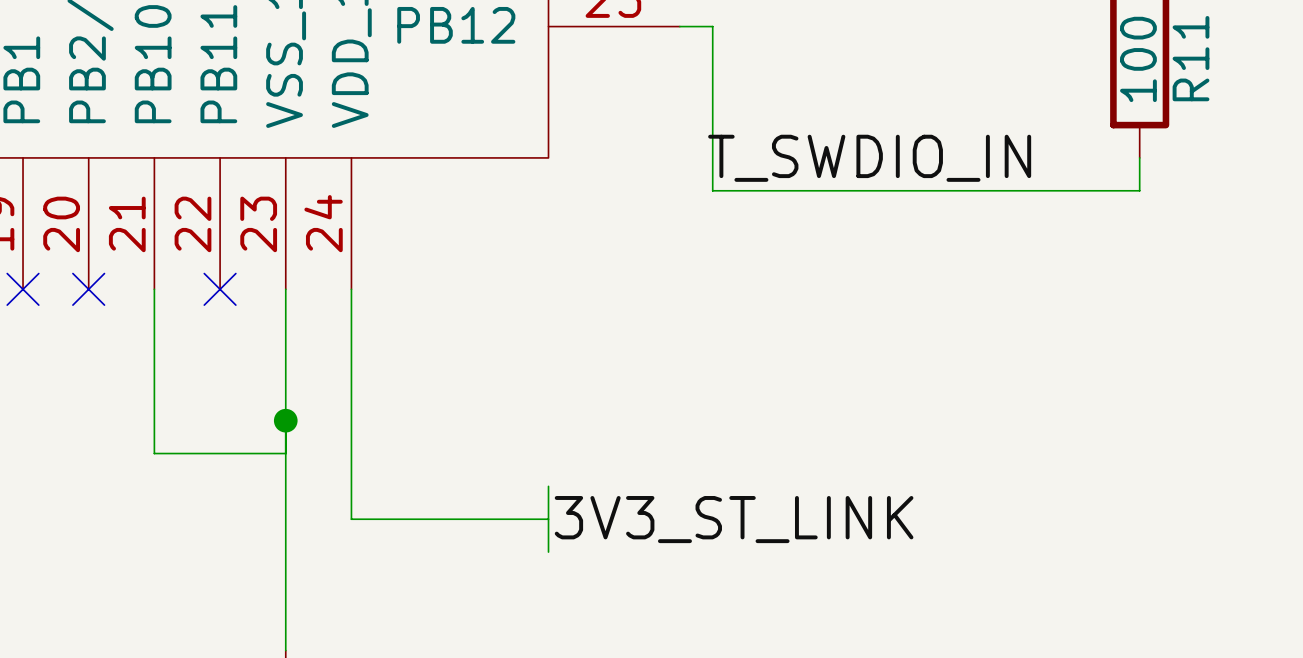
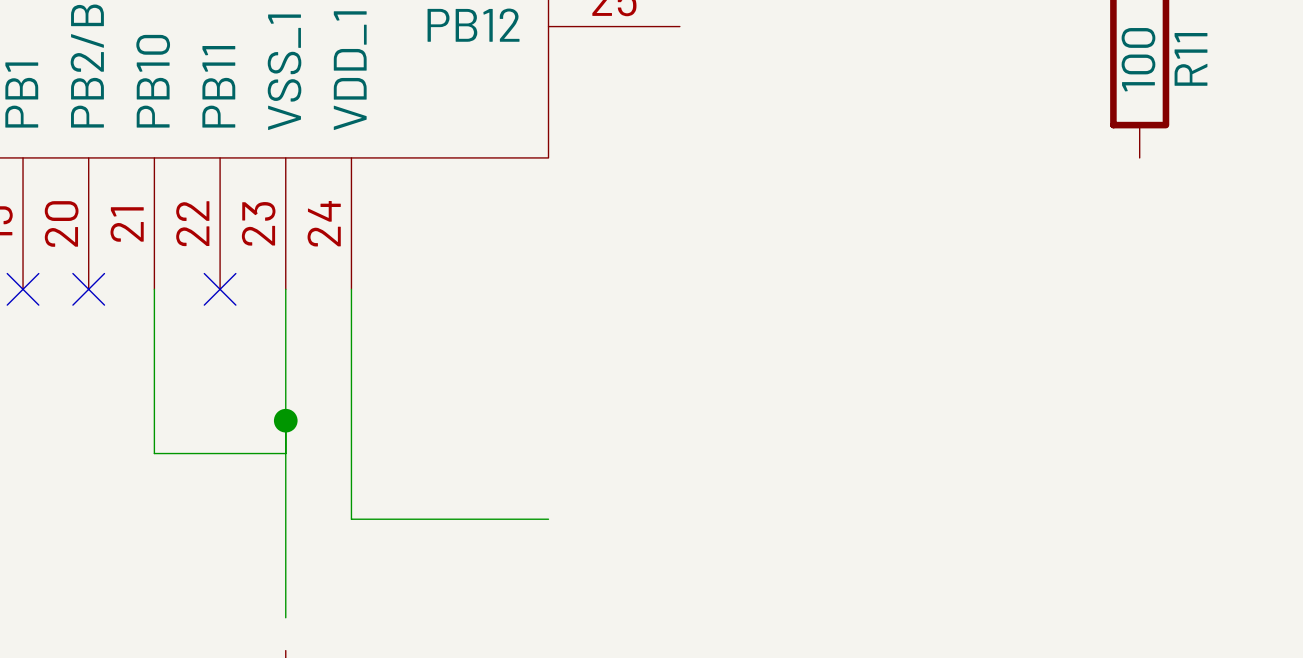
wire: (679, 26) (712, 26) (712, 190) (1139, 190) (1139, 157) -> none
label: T_SWDIO_IN (869, 158) -> none
wire: (548, 486) (548, 552) -> none
label: 3V3_ST_LINK (734, 519) -> none
wire: (285, 617) (285, 650) -> none

